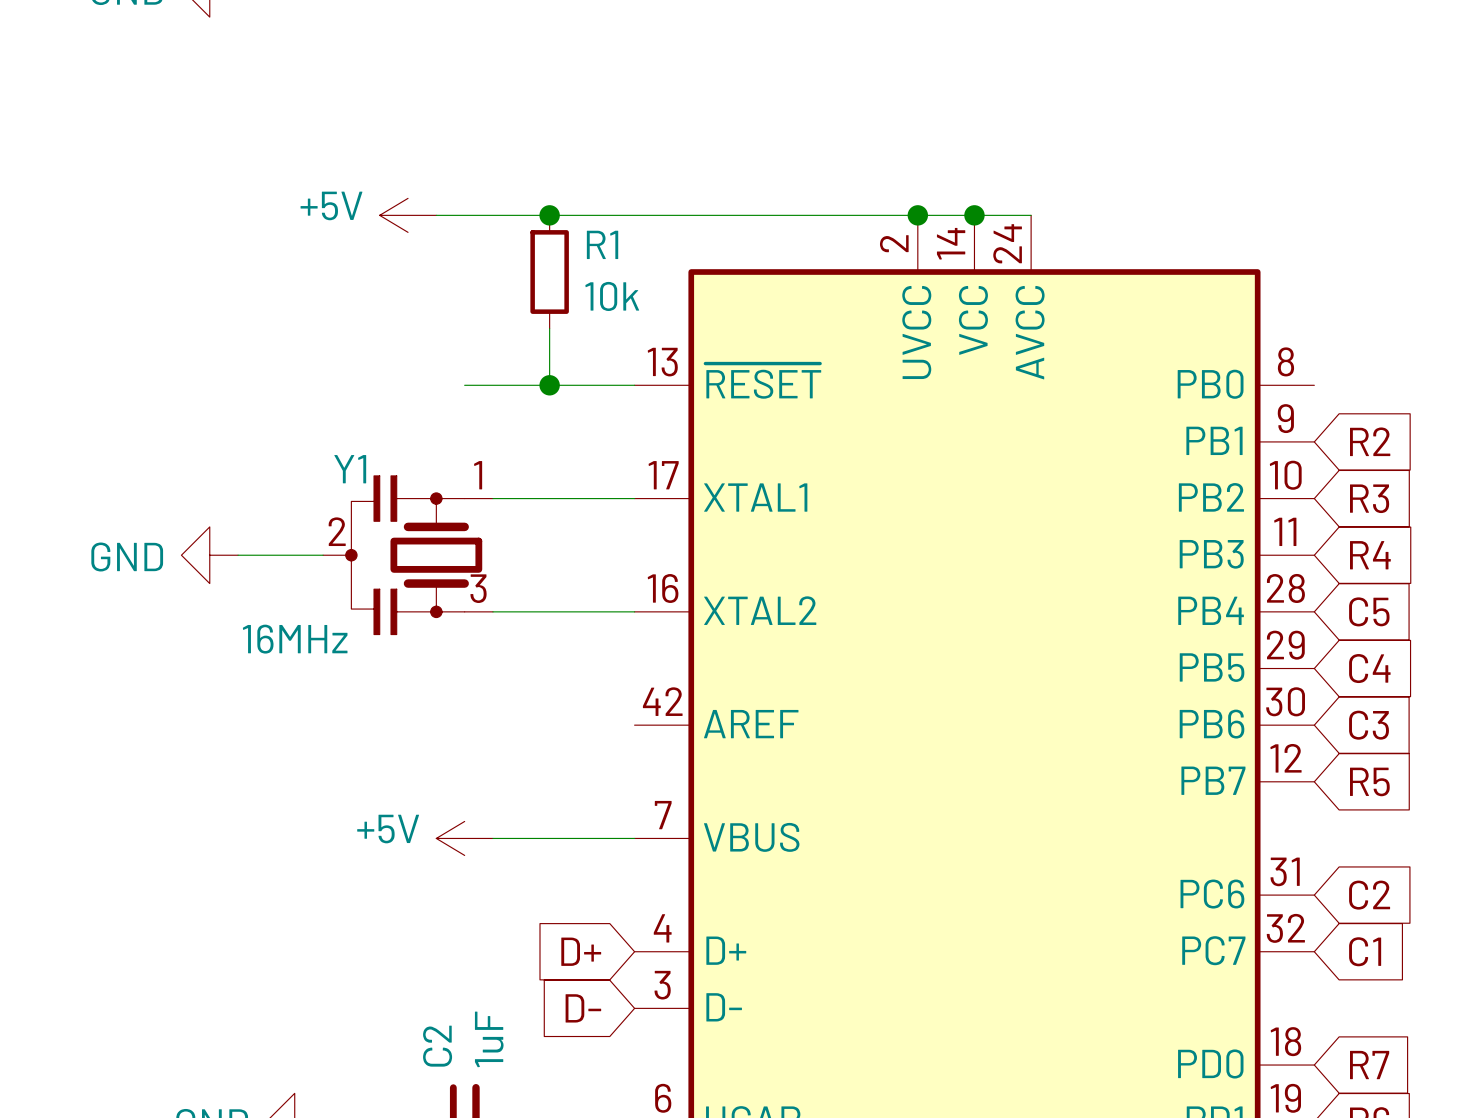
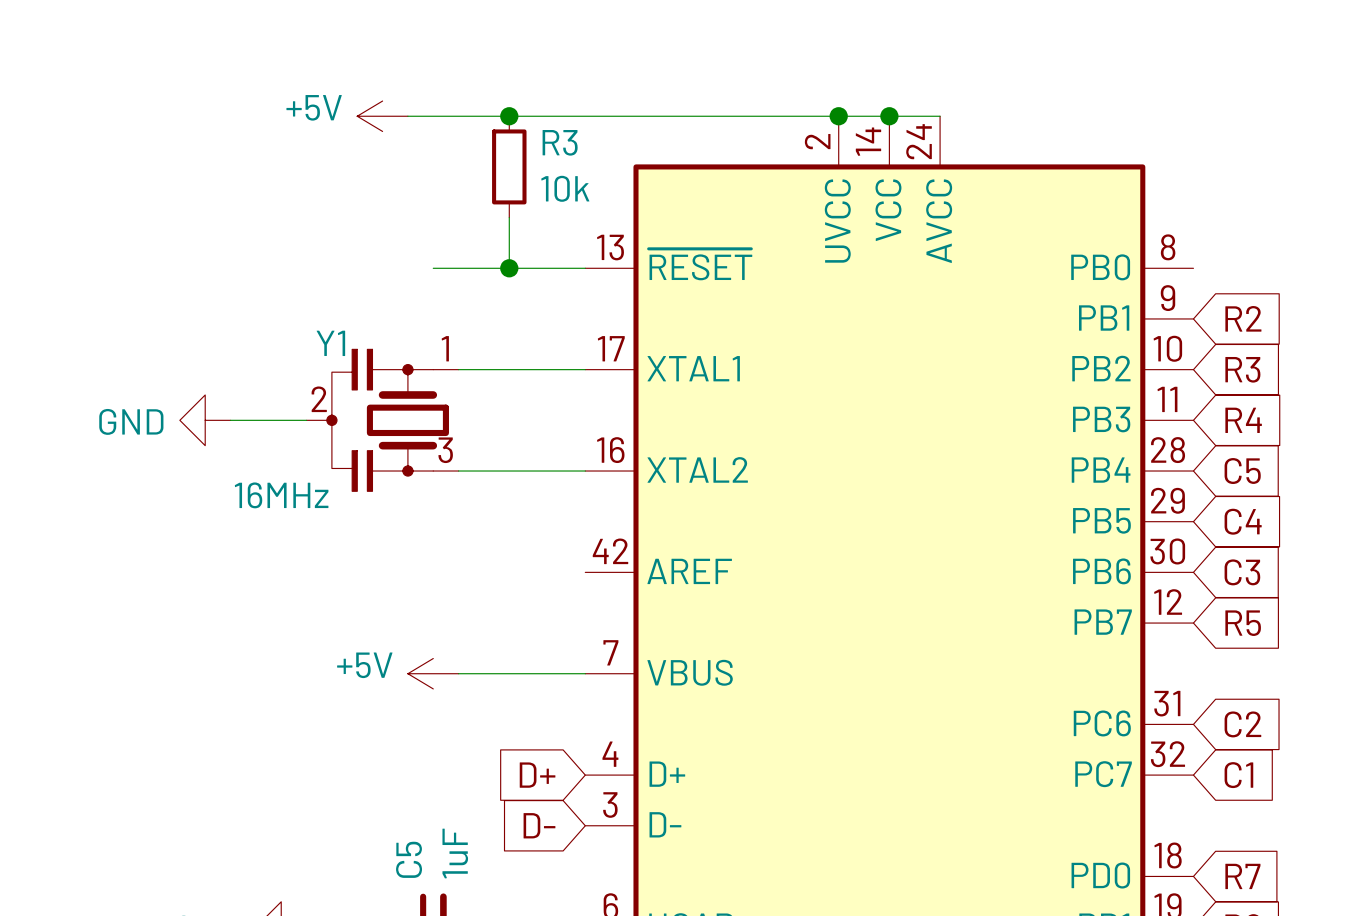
R1 name: R1 (602, 244) -> R3 (560, 142)
C2 name: C2 (437, 1046) -> C5 (409, 859)

